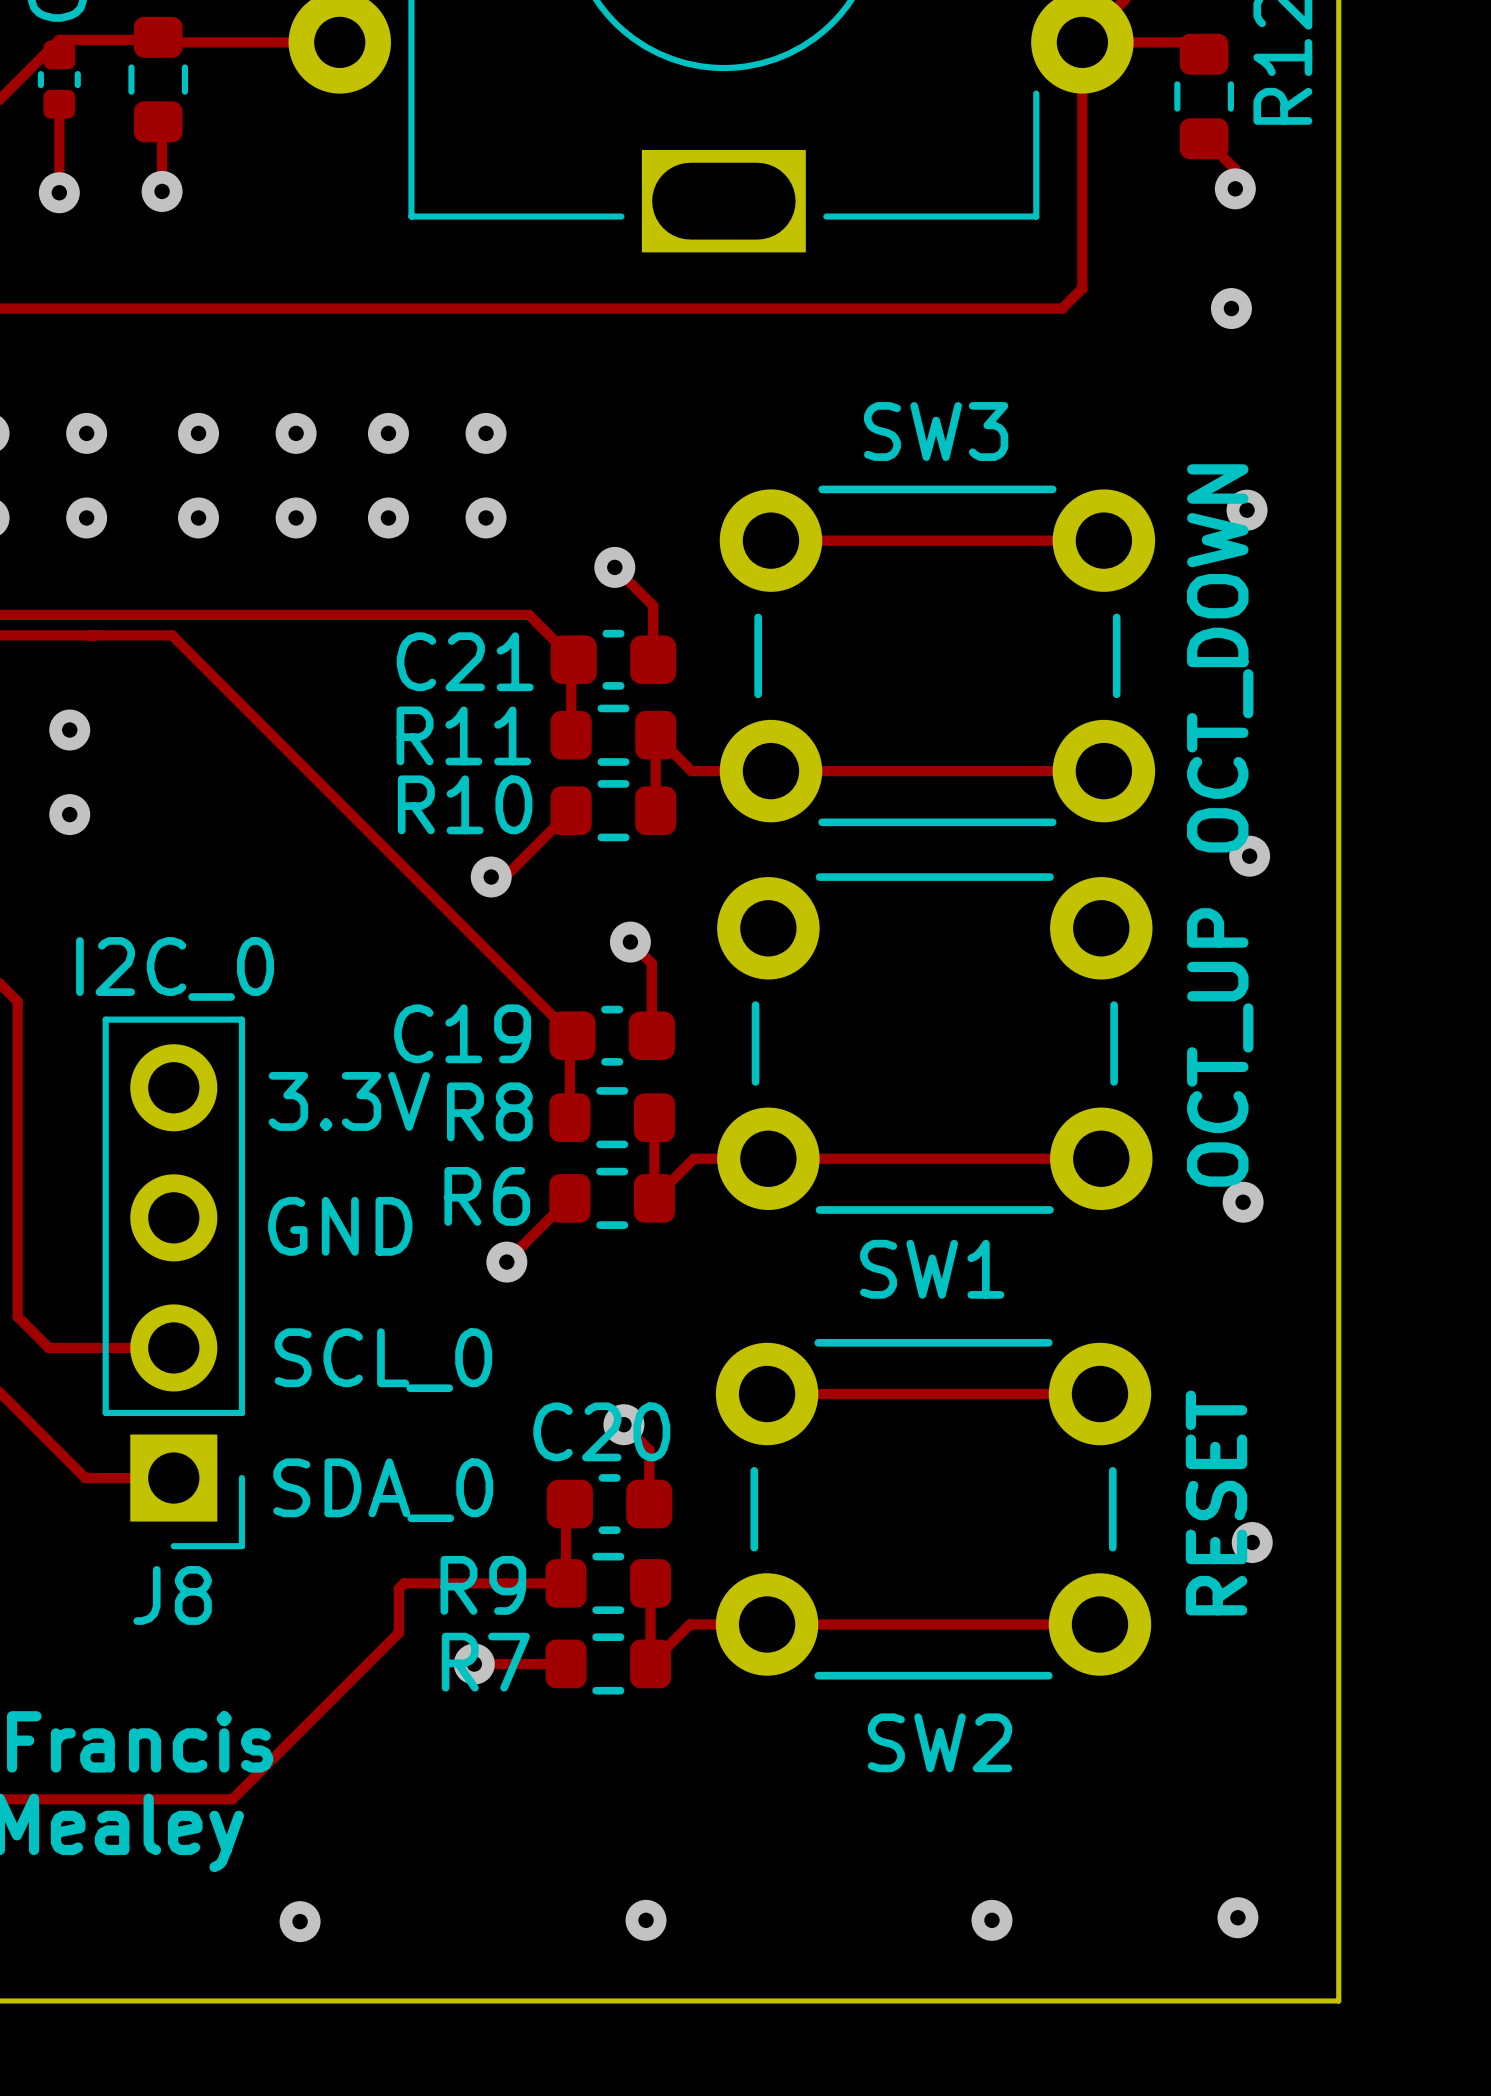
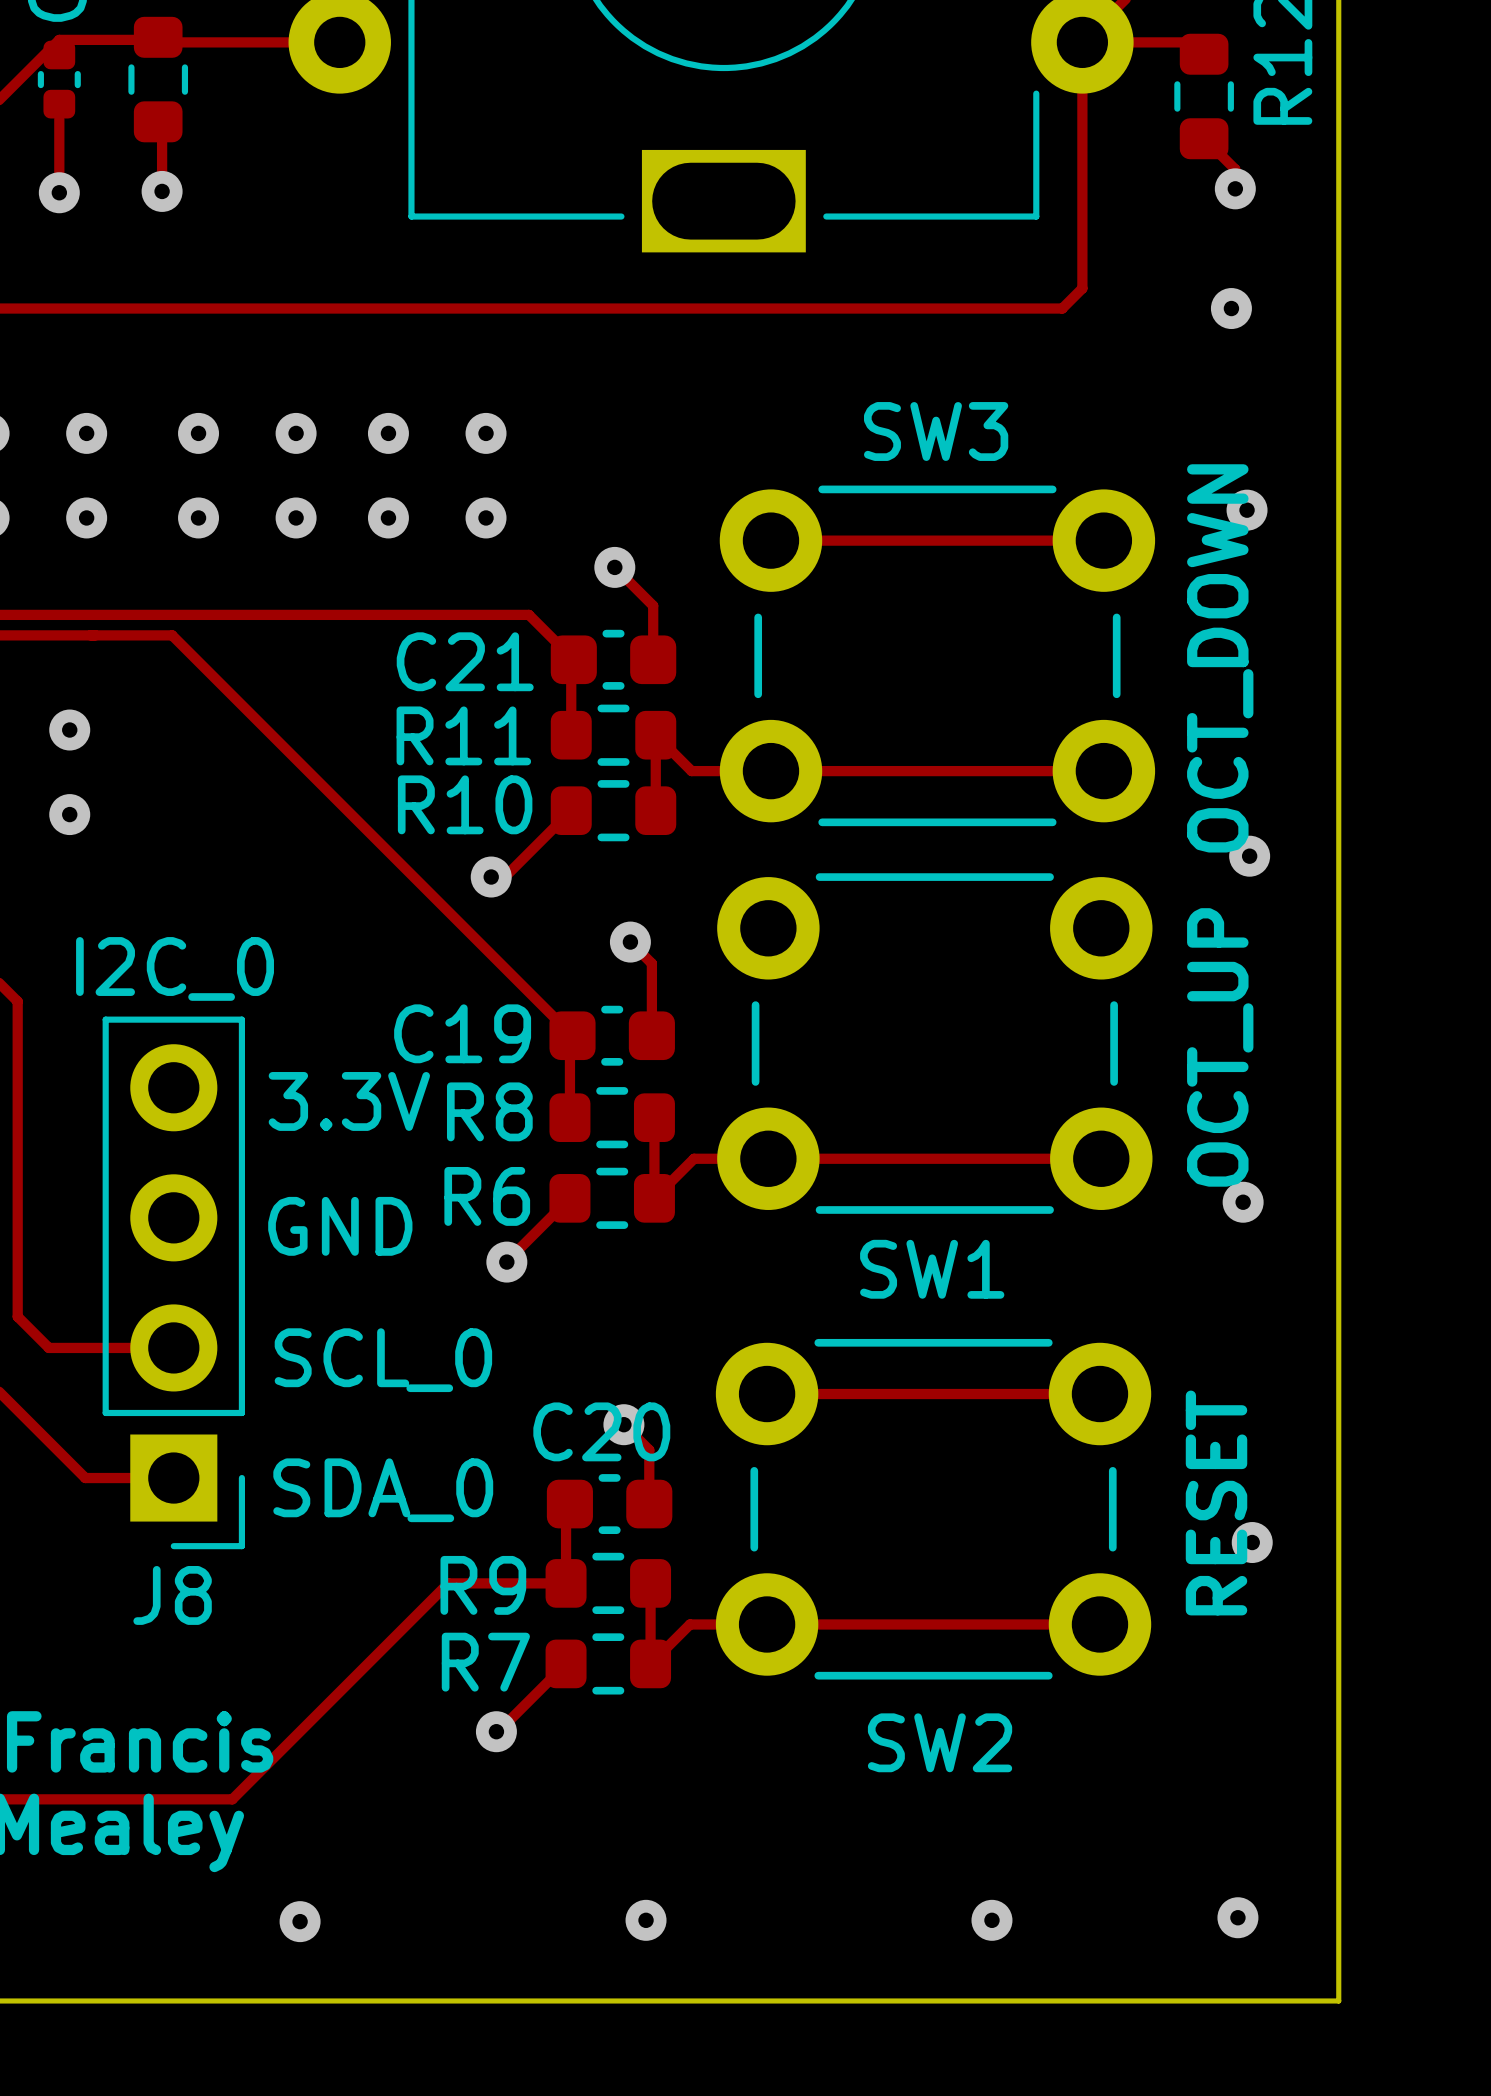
top track: (448, 1583) (404, 1583) (398, 1588) (398, 1632) -> (448, 1583) (398, 1632)
top track: (474, 1664) (565, 1664) -> (496, 1731) (565, 1664)
via position: (474, 1664) -> (496, 1731)

